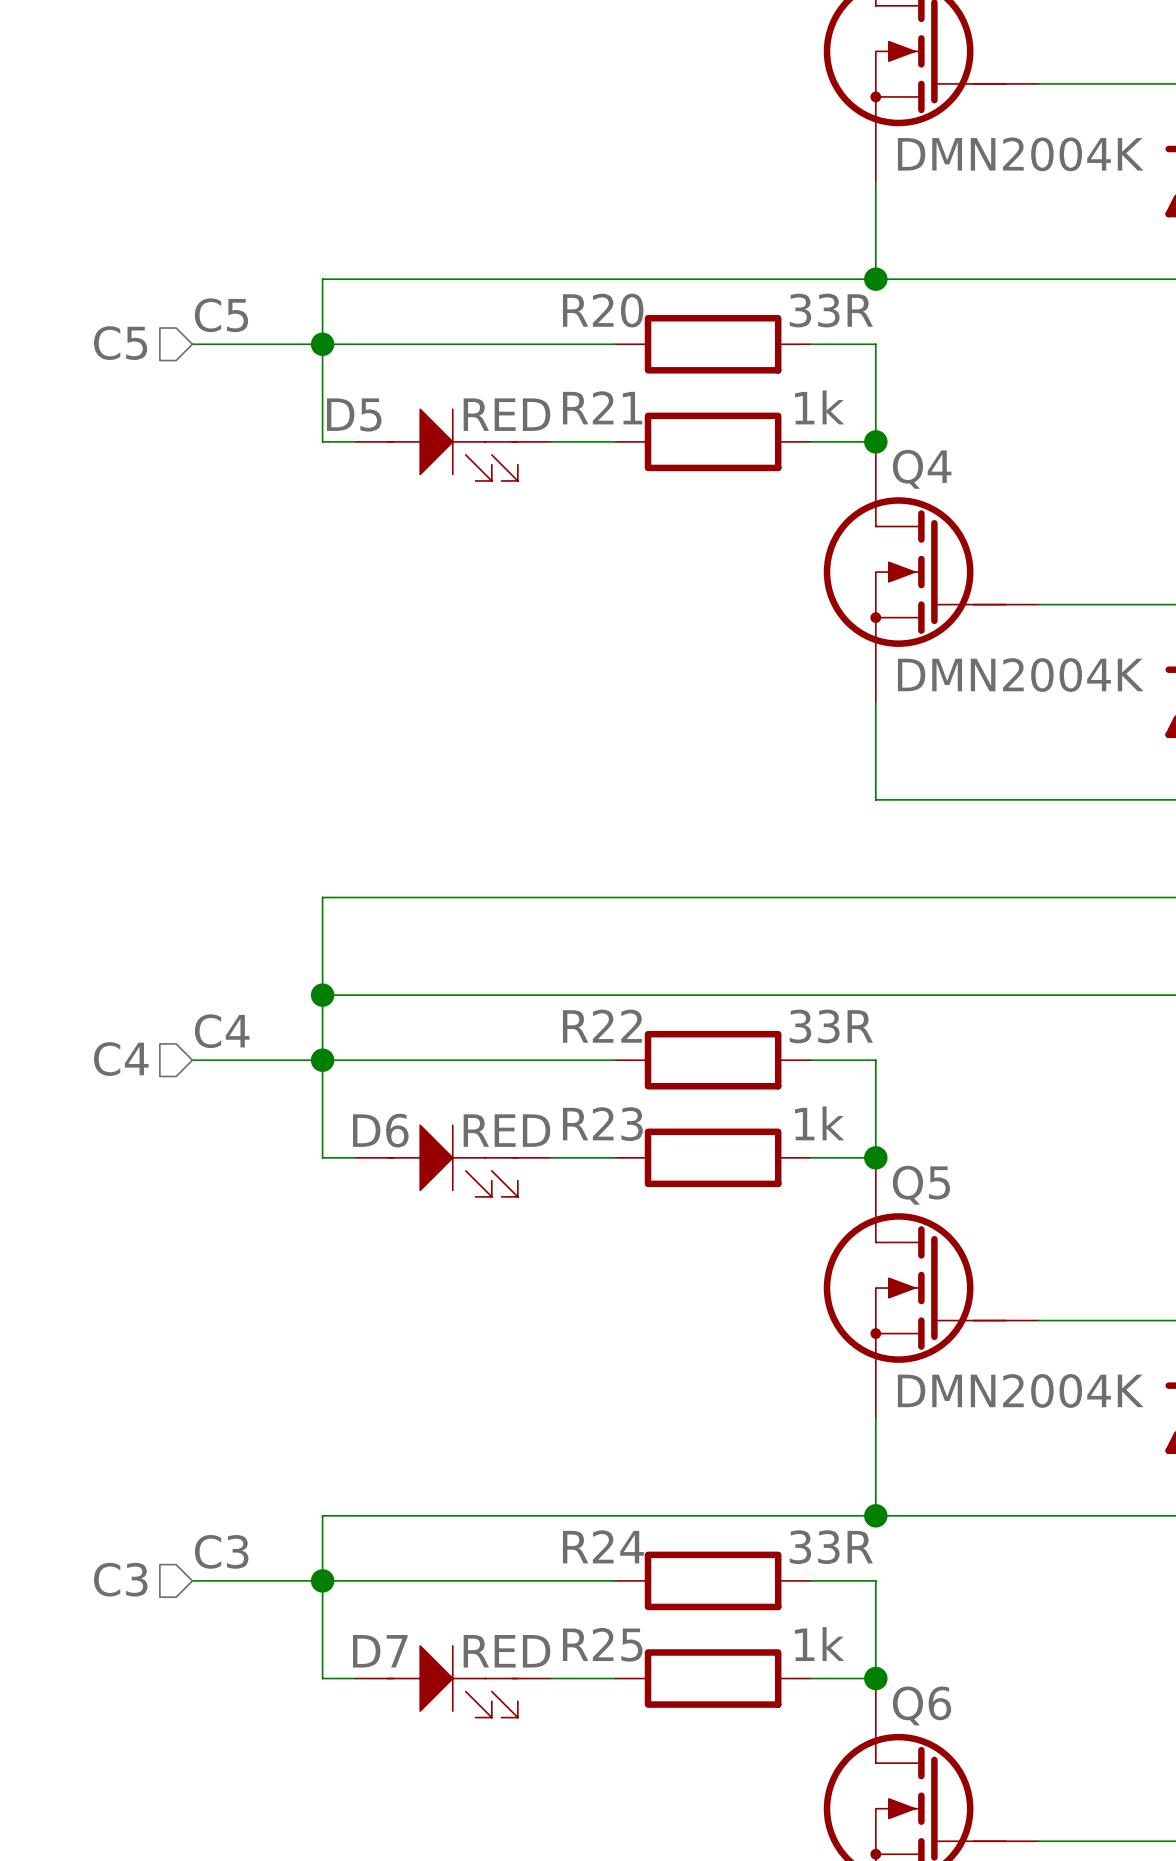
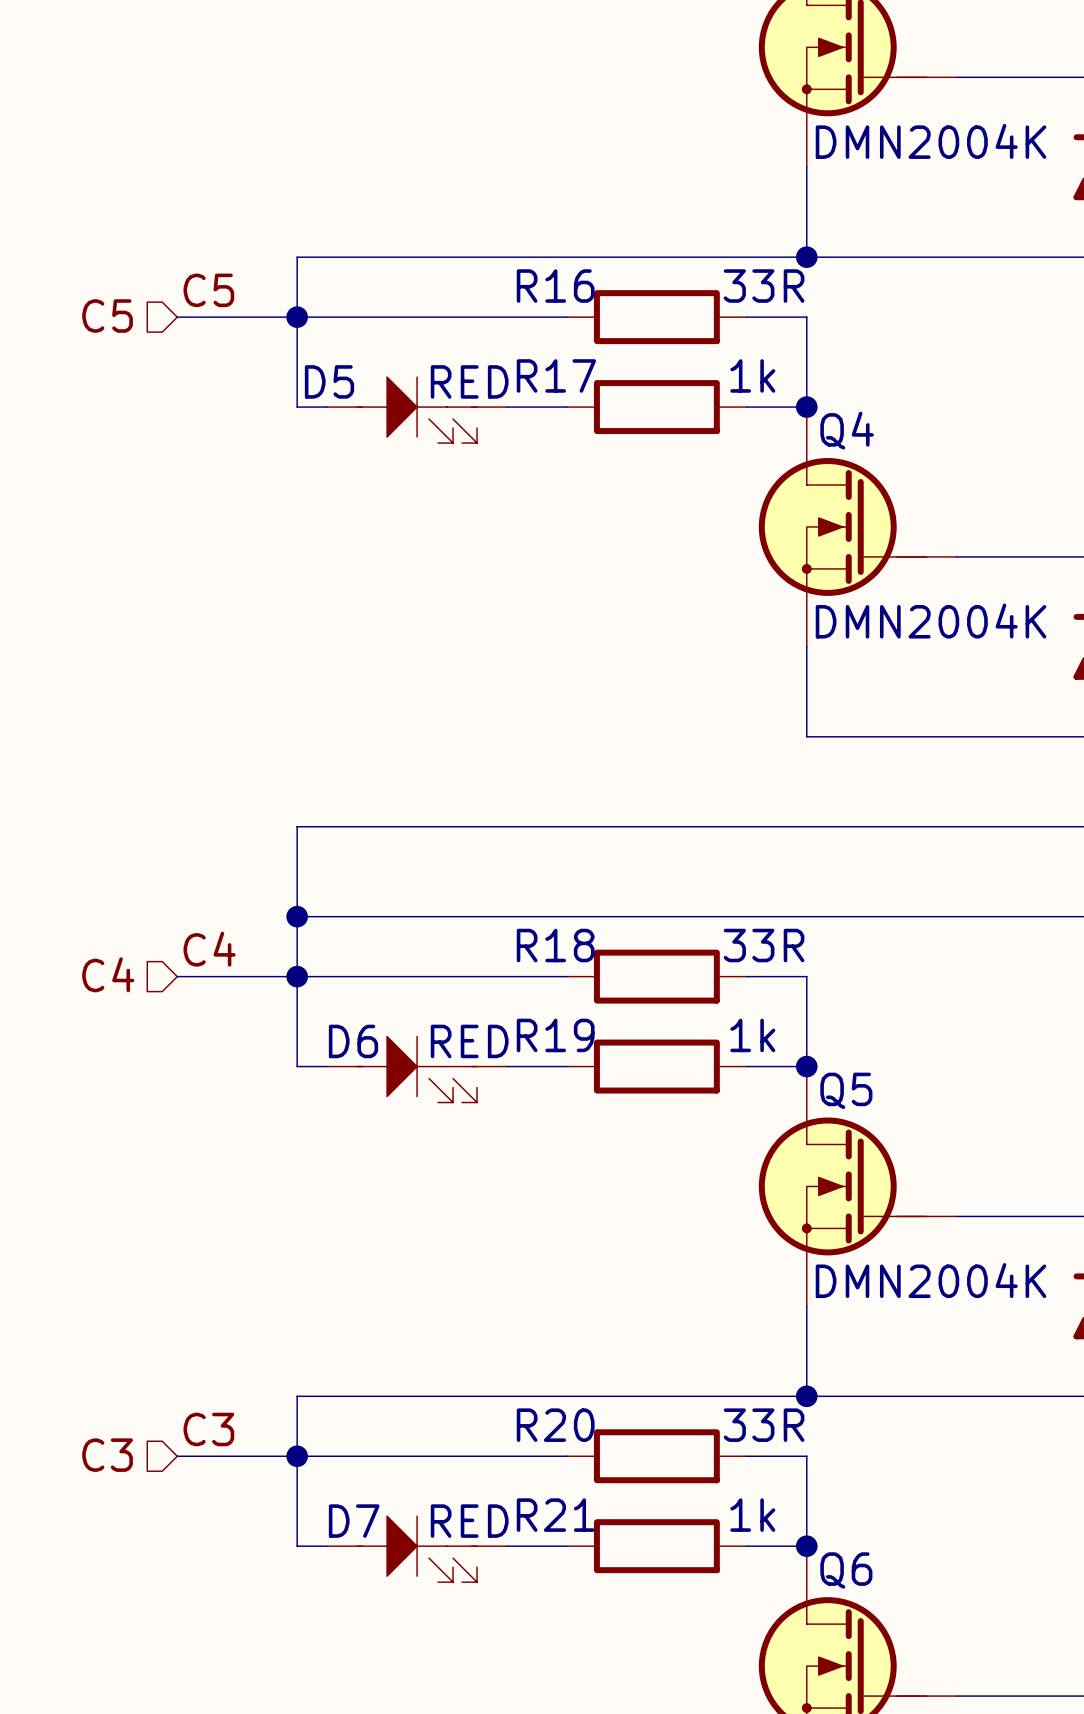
R20 name: R20 (603, 310) -> R16 (555, 286)
R21 name: R21 (602, 407) -> R17 (556, 375)
R22 name: R22 (602, 1026) -> R18 (555, 945)
R23 name: R23 (602, 1124) -> R19 (555, 1035)
R24 name: R24 (603, 1546) -> R20 (555, 1425)
R25 name: R25 (602, 1644) -> R21 (555, 1515)

